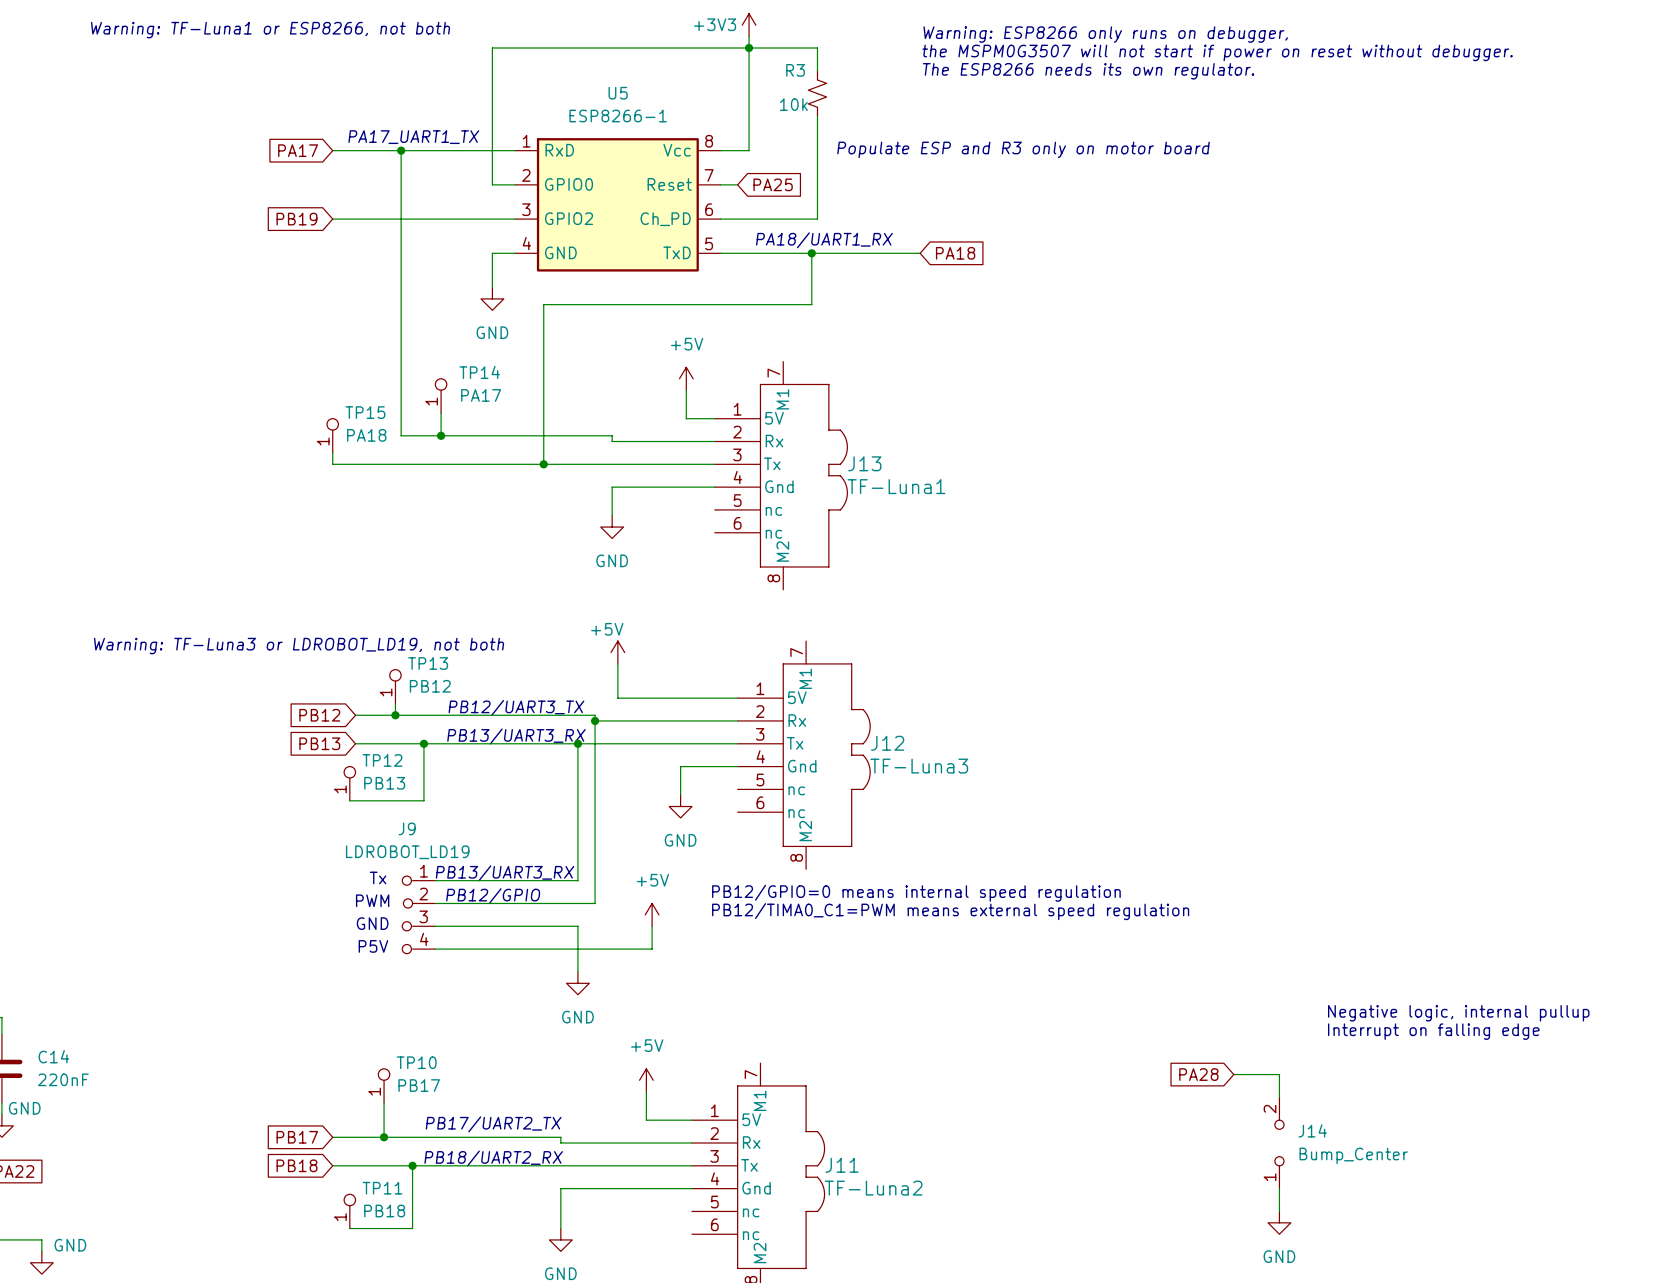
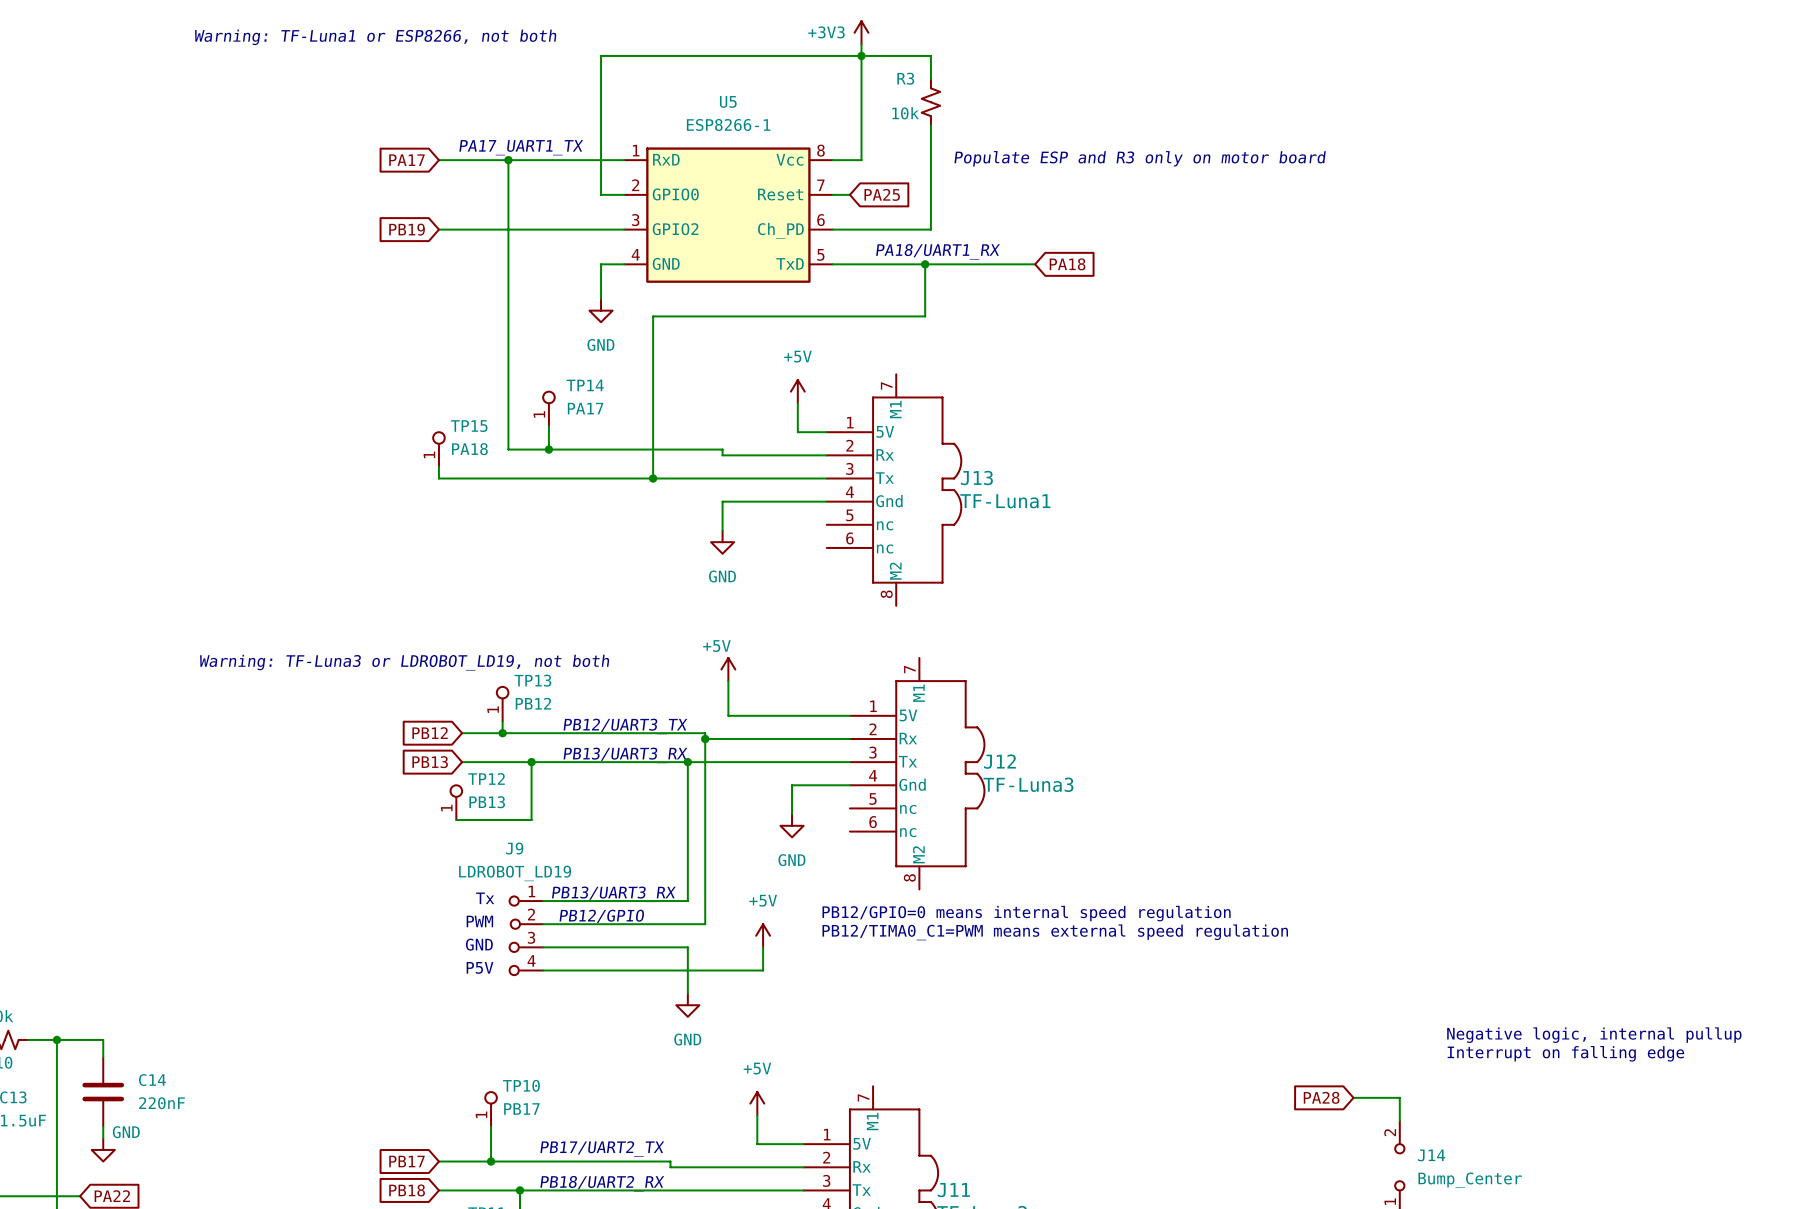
text: Warning: ESP8266 only runs on debugger, (1105, 34) -> none
text: the MSPM0G3507 will not start if power on reset without debugger. (1217, 52) -> none
text: The ESP8266 needs its own regulator. (1088, 71) -> none

